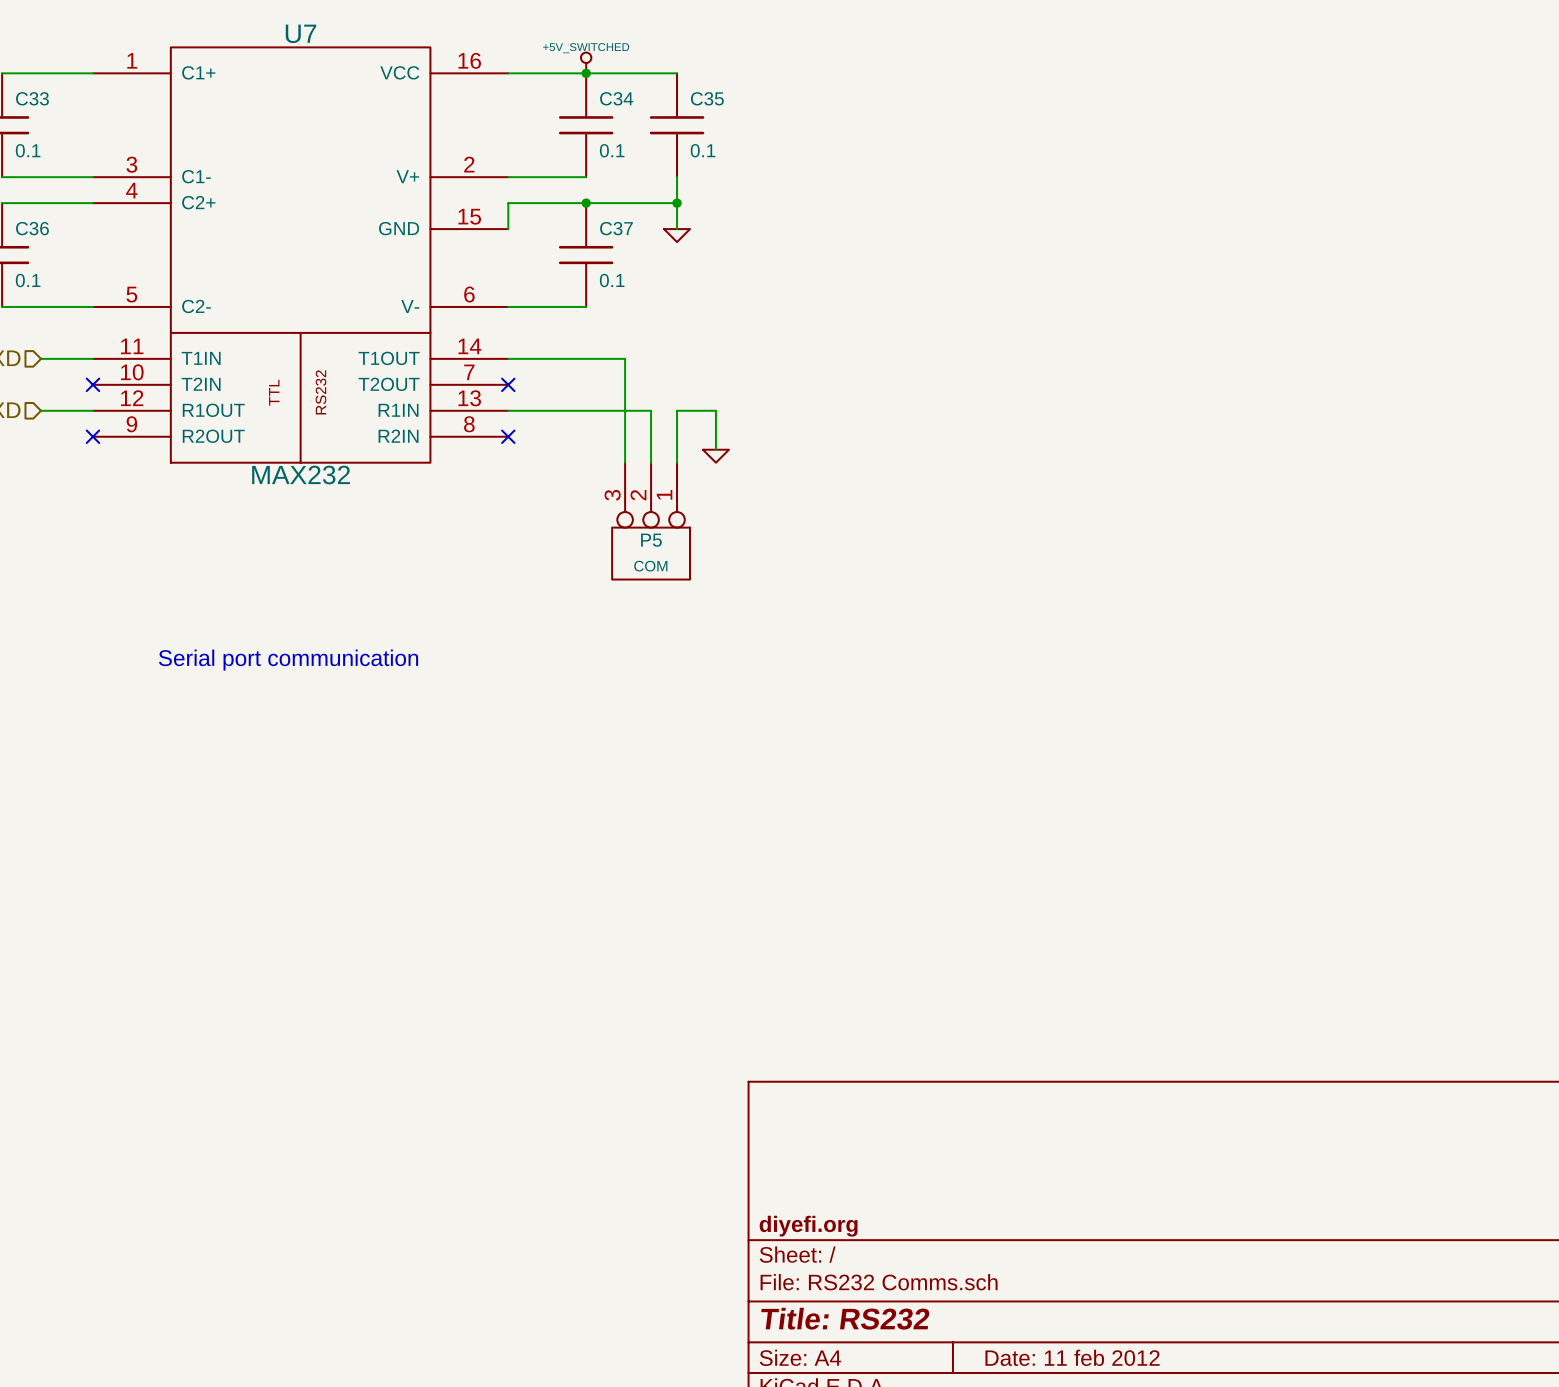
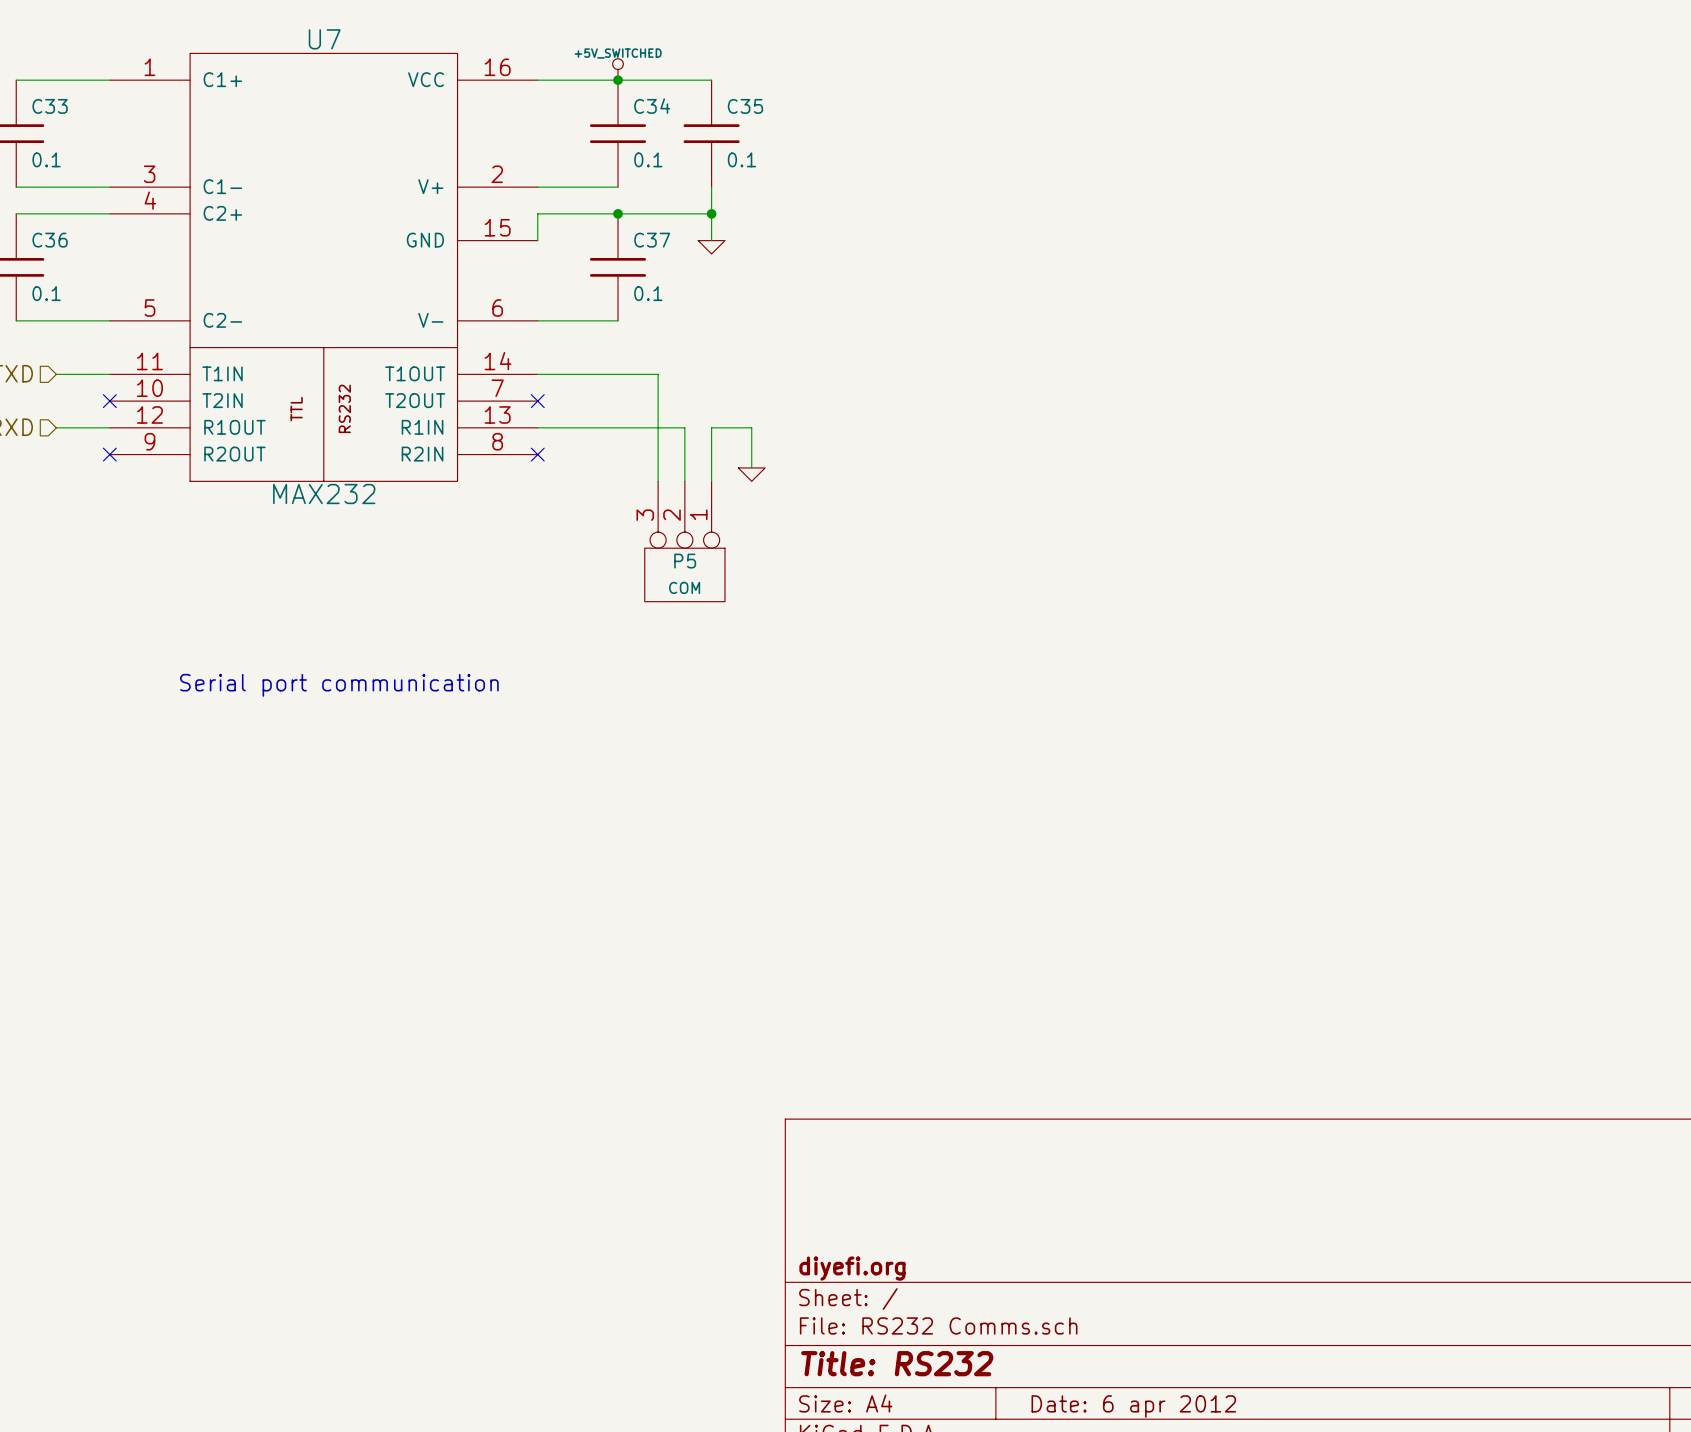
title block: Date: 11 feb 2012 (1072, 1357) -> Date: 6 apr 2012 (1133, 1406)

